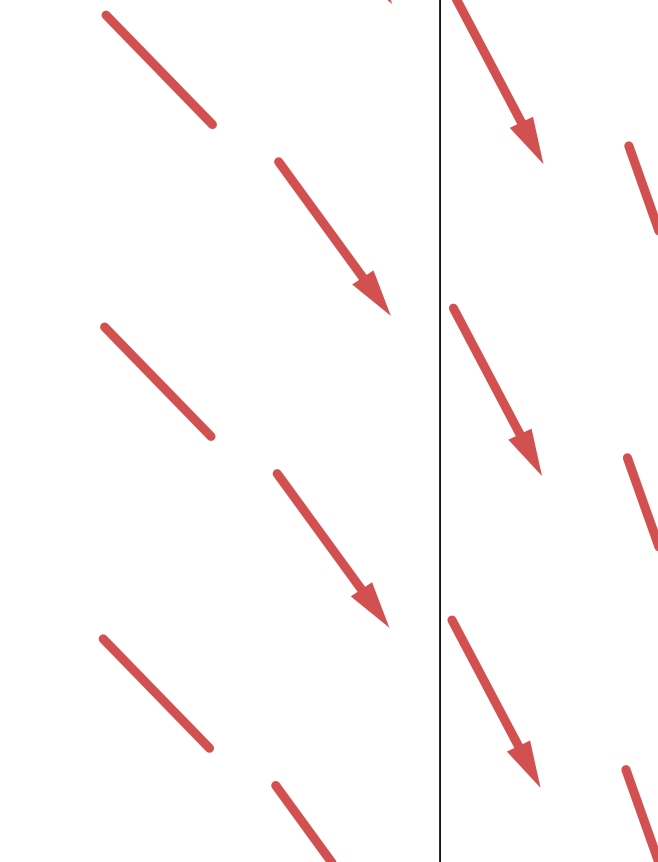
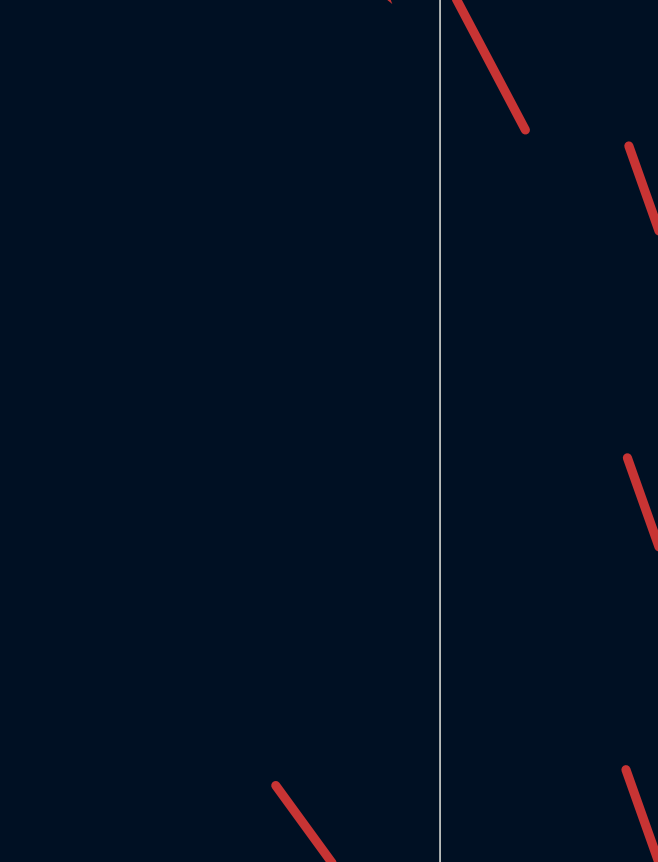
track: (106, 15) (212, 124) -> none
drawing: [509, 116, 544, 165] -> none
track: (278, 161) (367, 284) -> none
drawing: [352, 270, 391, 316] -> none
track: (453, 308) (523, 441) -> none
track: (104, 327) (210, 436) -> none
drawing: [508, 428, 543, 477] -> none
track: (277, 473) (366, 596) -> none
drawing: [350, 582, 390, 628] -> none
track: (451, 620) (522, 753) -> none
track: (103, 638) (209, 748) -> none
drawing: [506, 740, 541, 788] -> none

